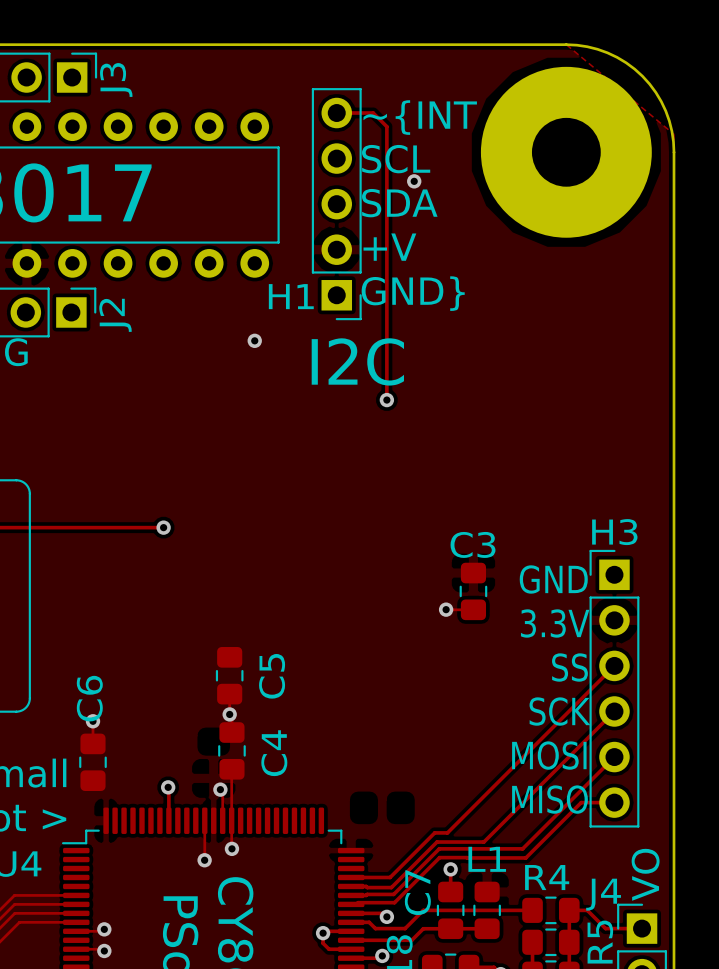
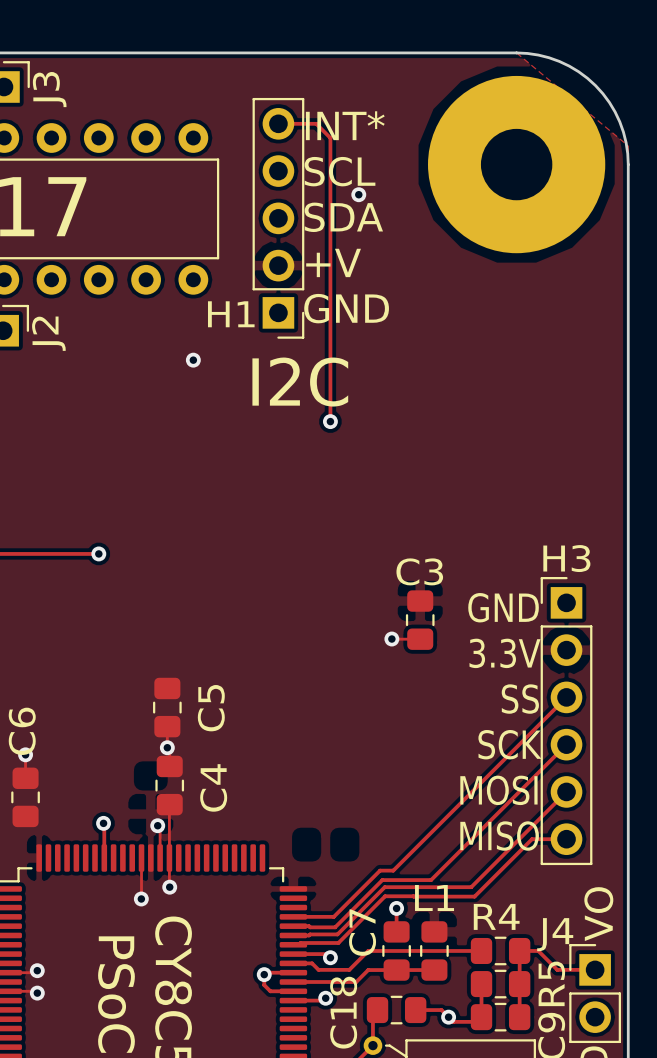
text: ~{INT (420, 117) -> INT* (345, 125)
text: GND} (413, 293) -> GND (346, 308)

